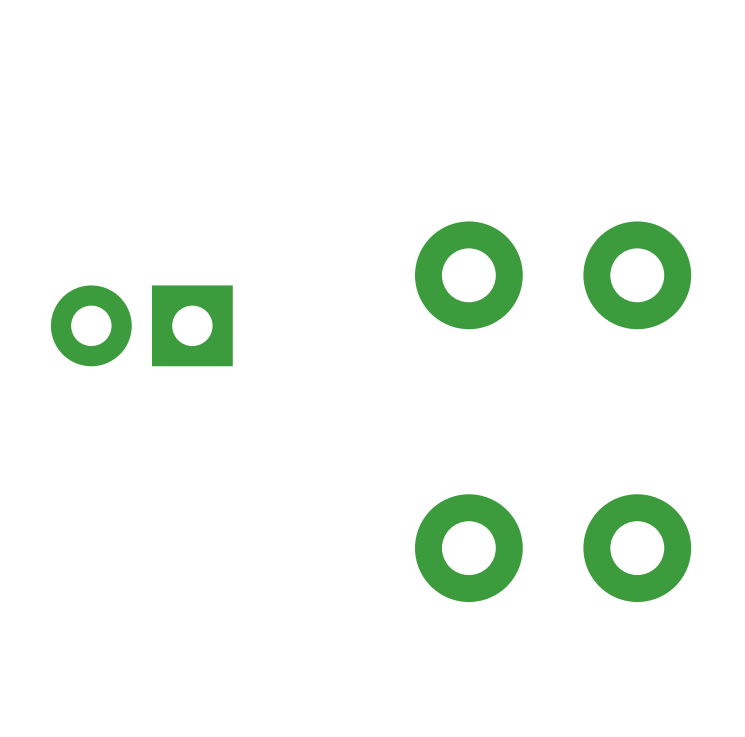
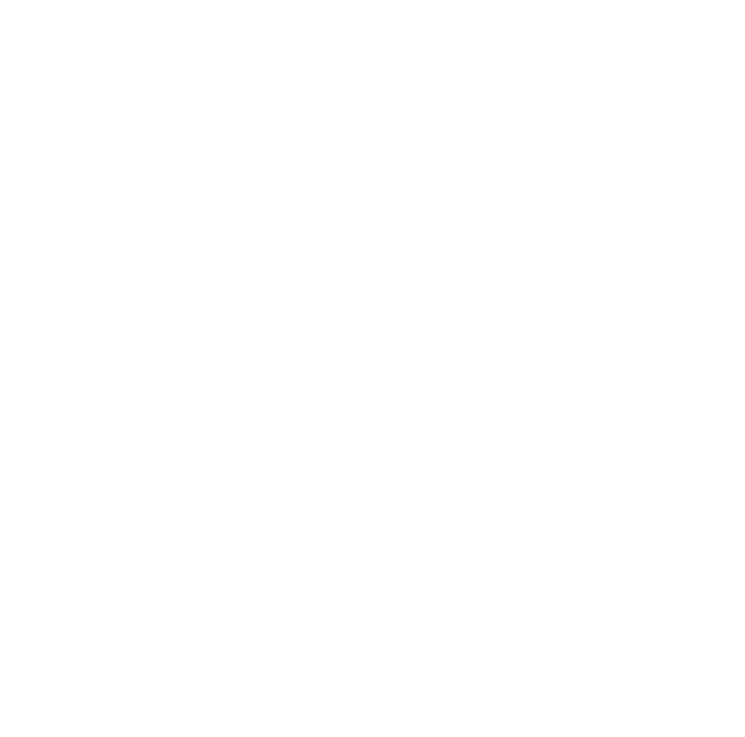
part: (553, 275) -> none
part: (141, 325) -> none
part: (553, 548) -> none

